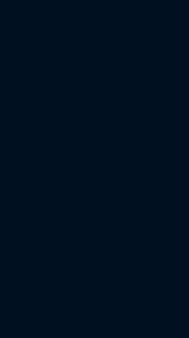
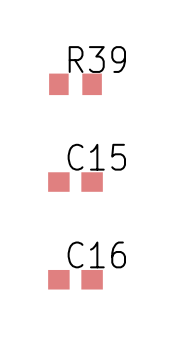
R39: none -> (75, 84)
C15: none -> (75, 182)
C16: none -> (75, 279)

